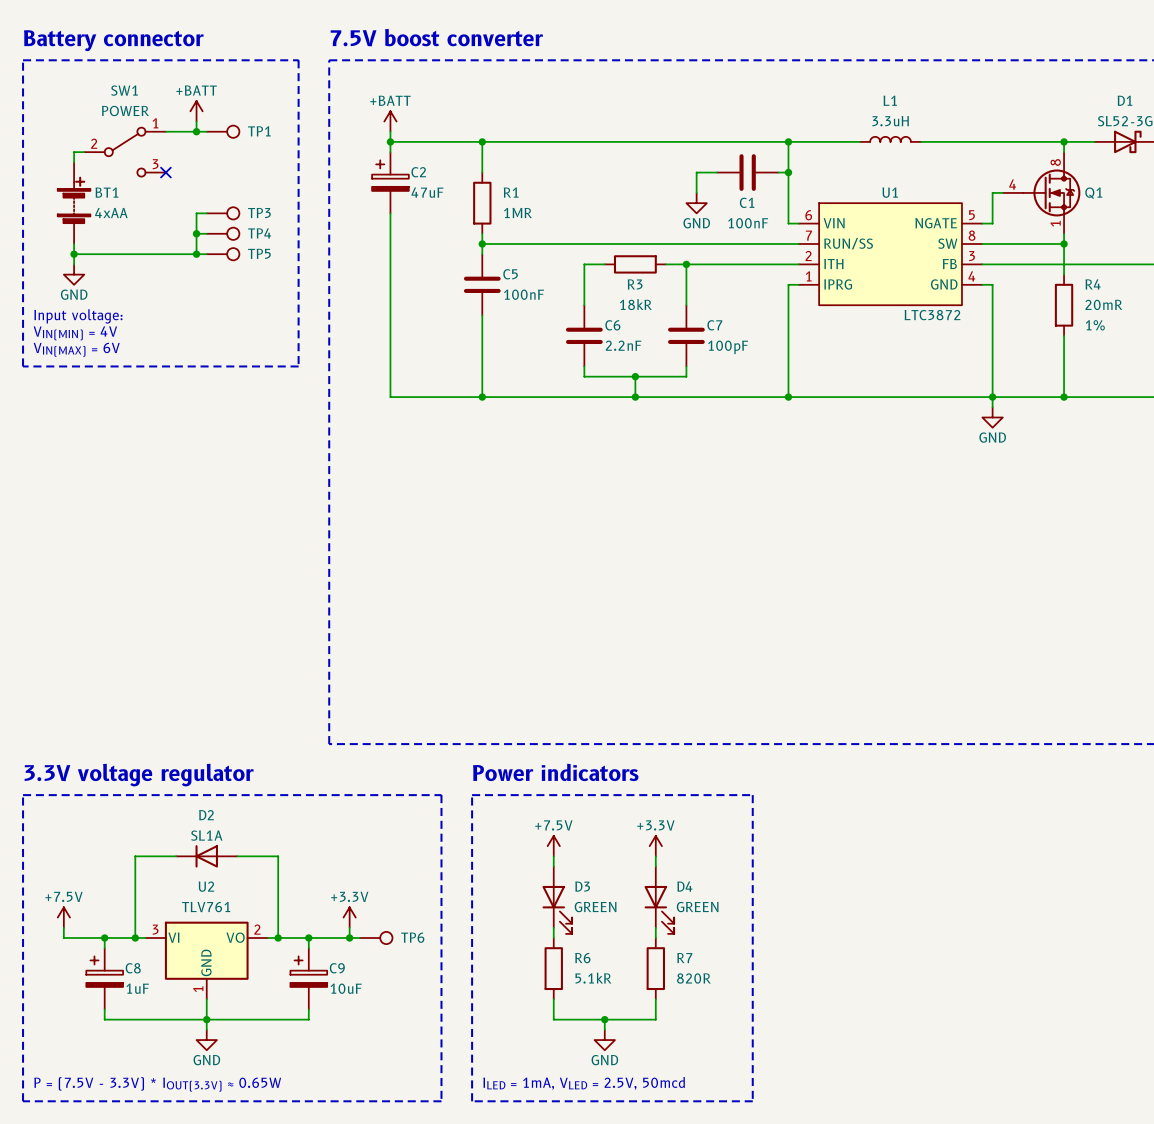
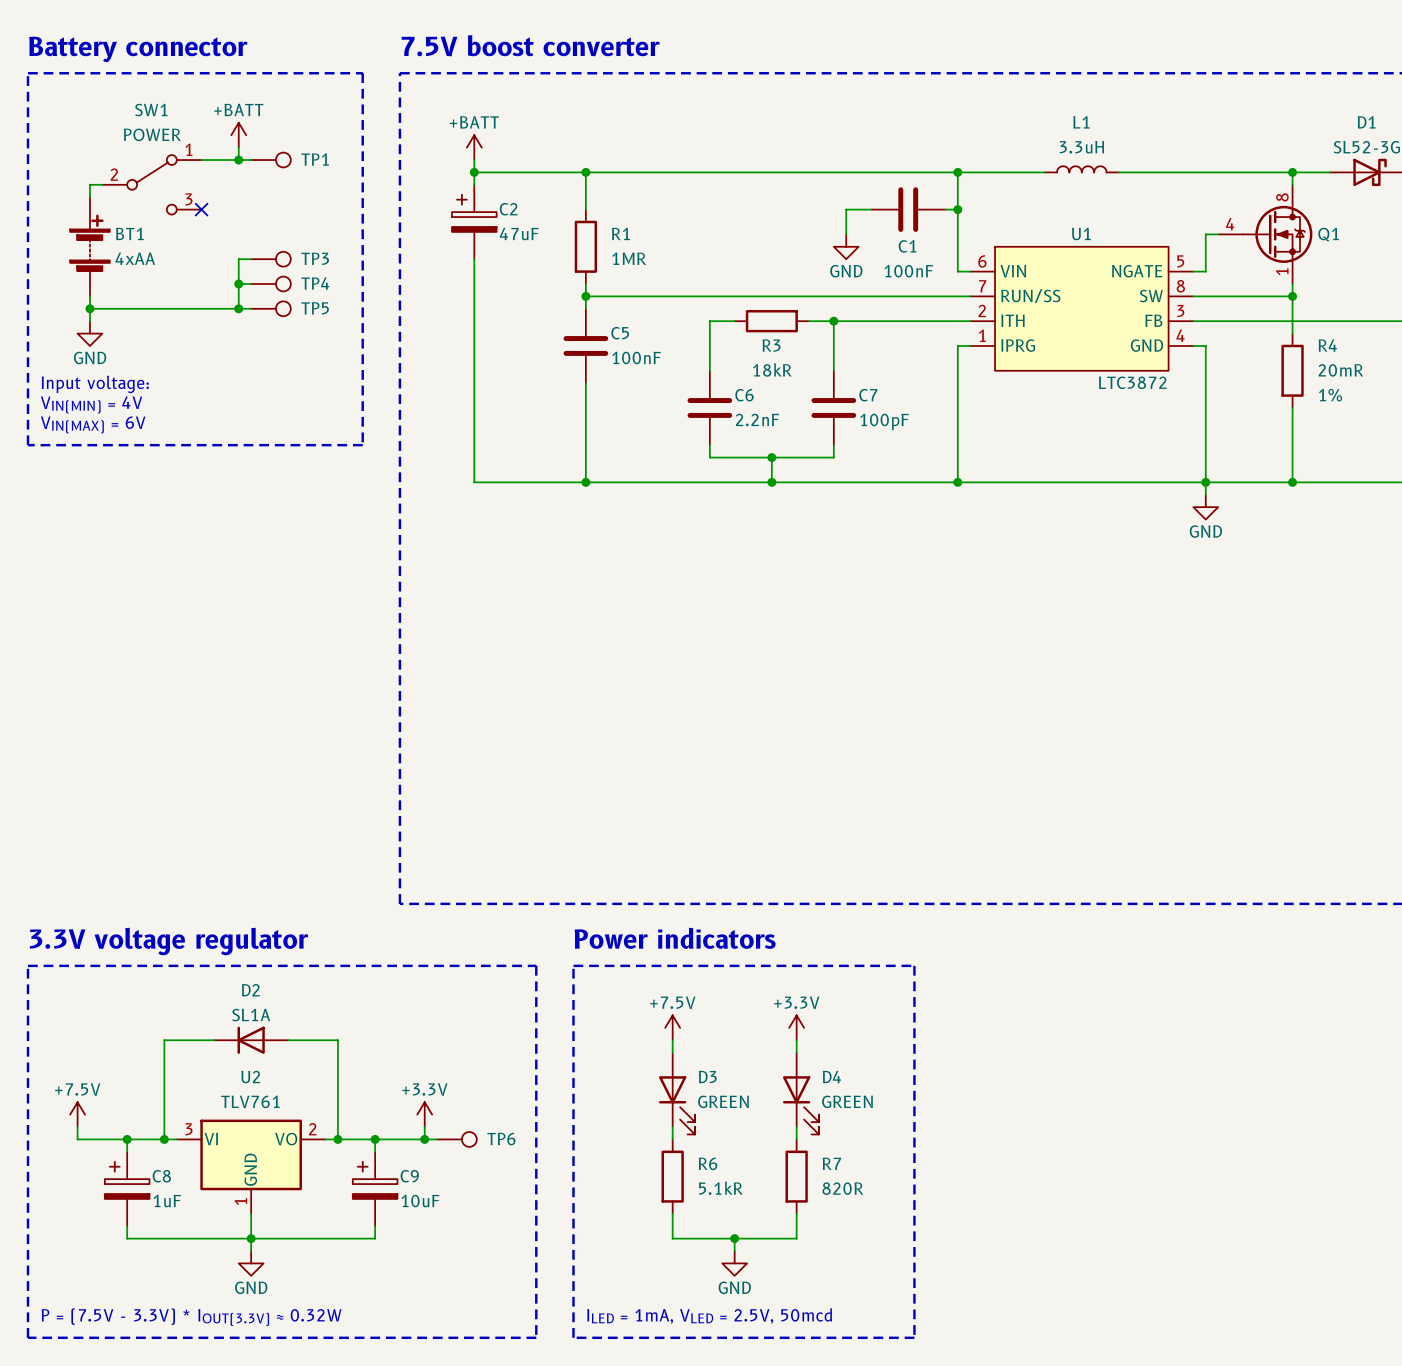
text: P = (7.5V - 3.3V) * IOUT(3.3V) ≈ 0.65W (157, 1084) -> P = (7.5V - 3.3V) * IOUT(3.3V) ≈ 0.32W (191, 1317)

